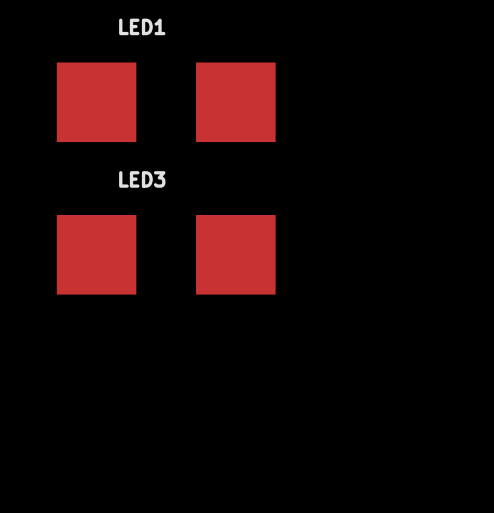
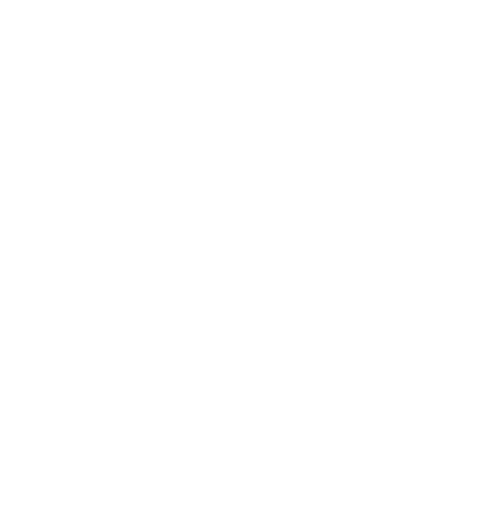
LED1: (166, 102) -> none
LED3: (166, 254) -> none

